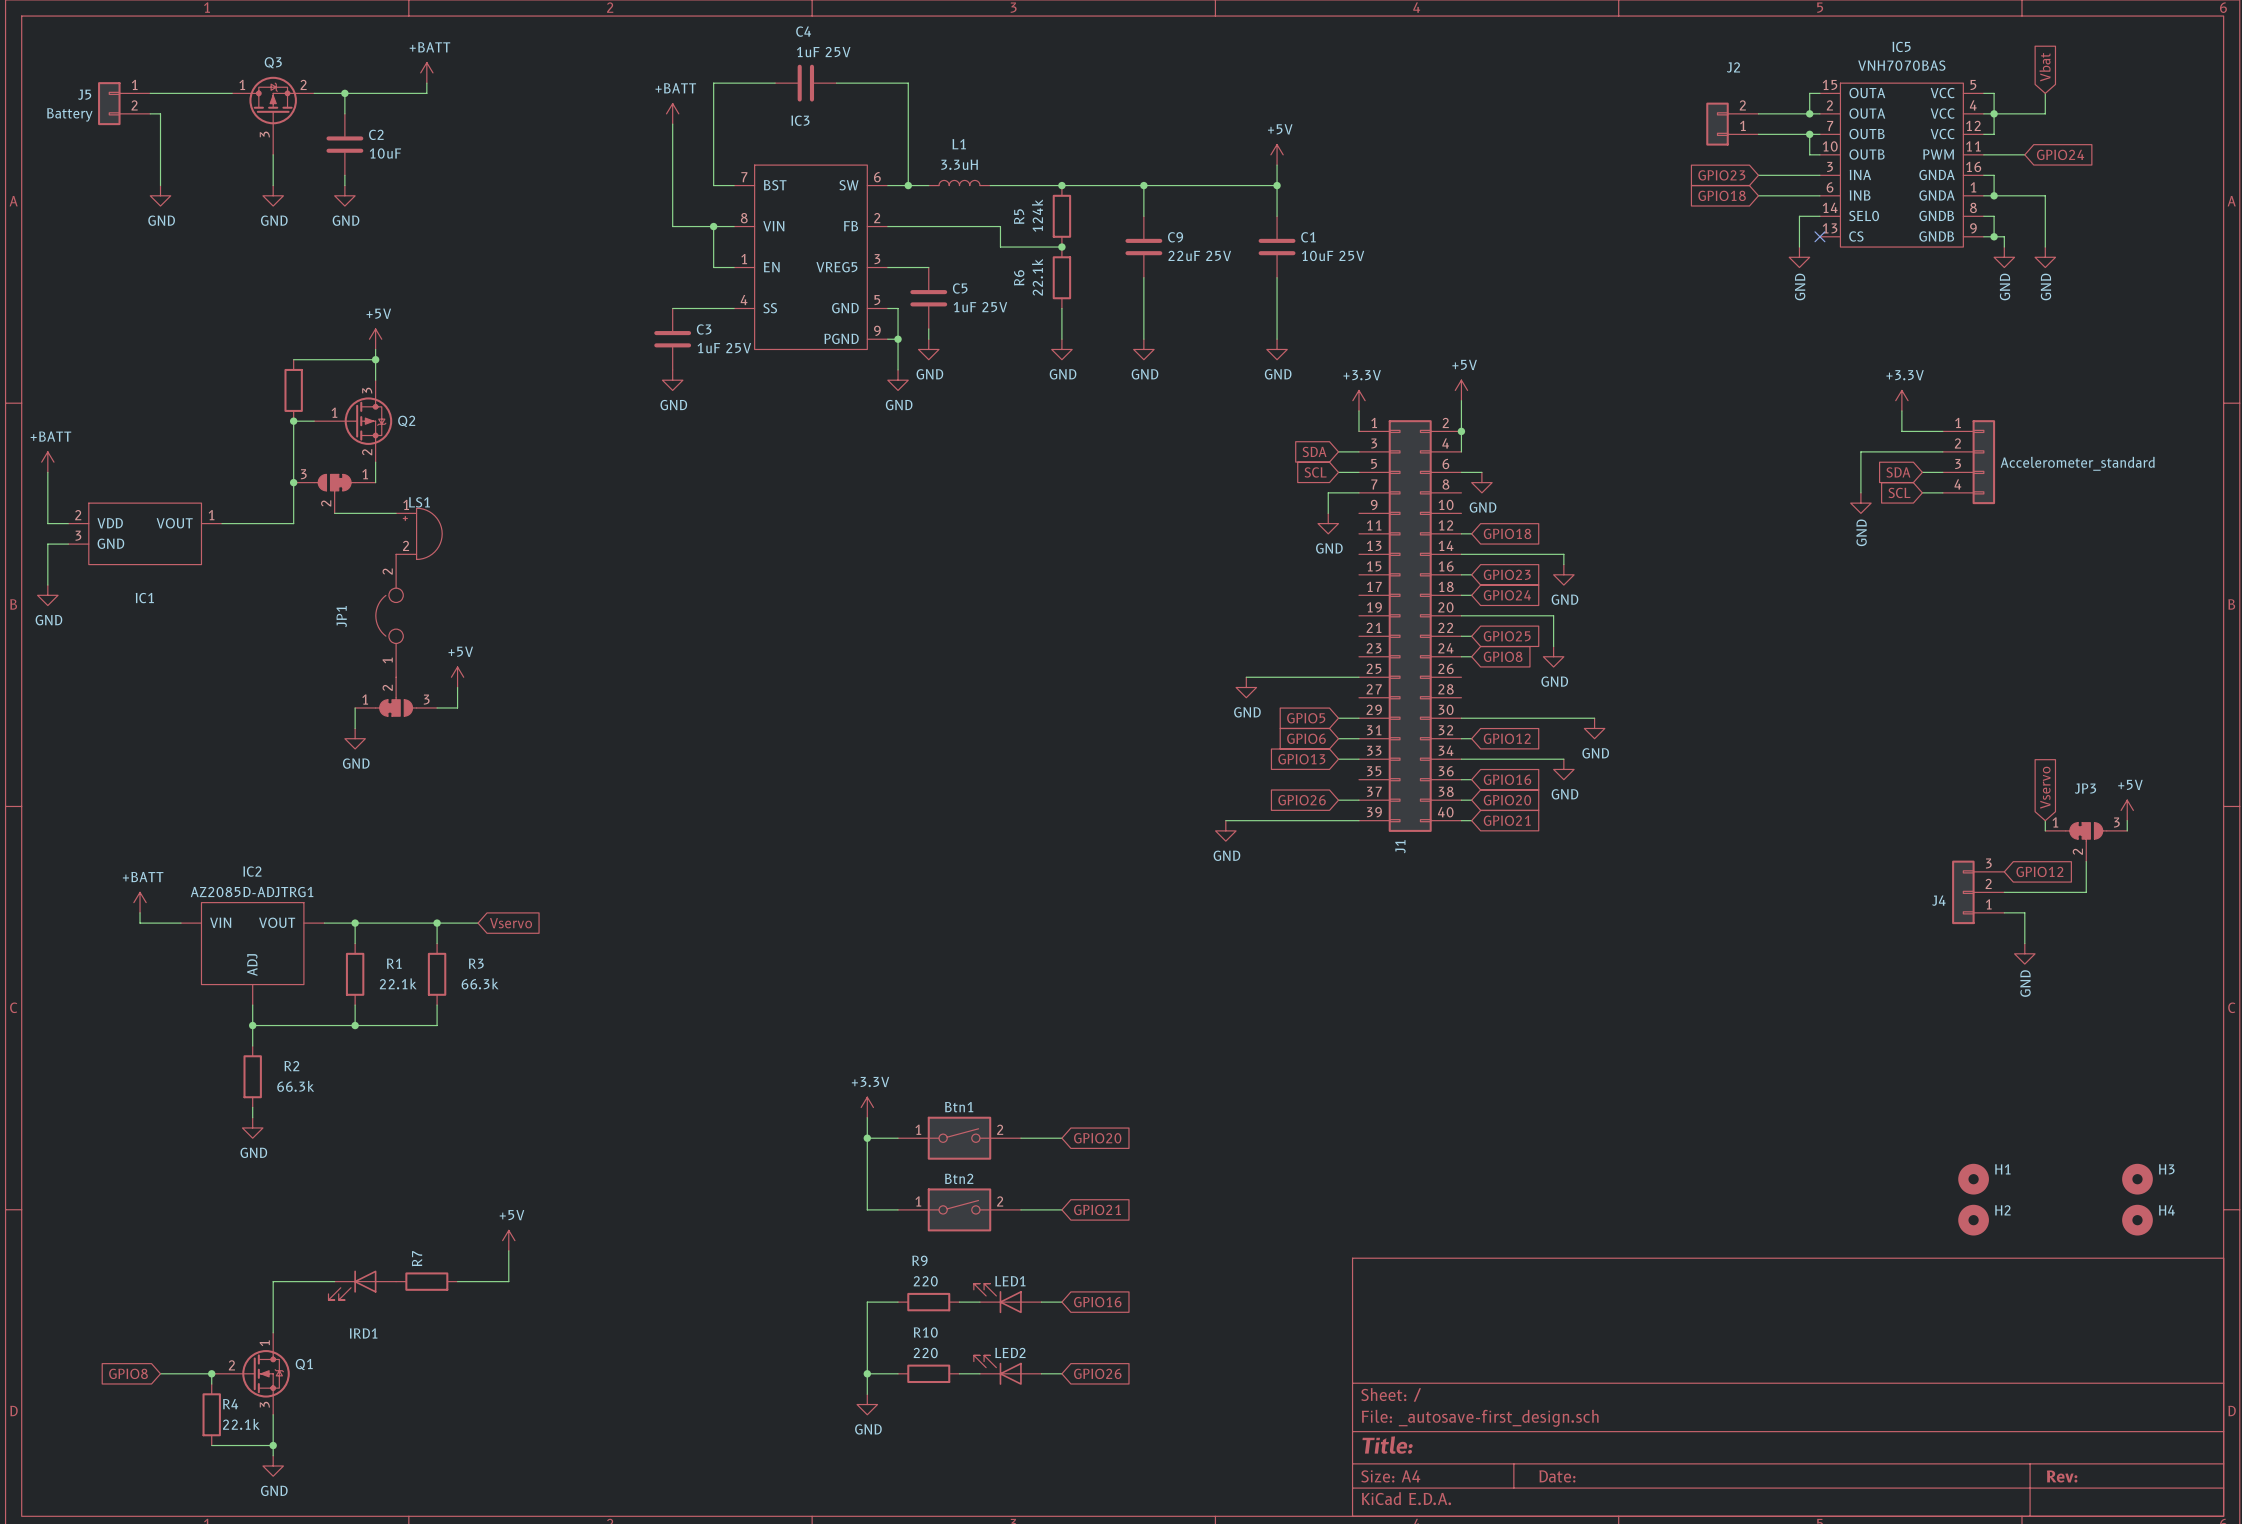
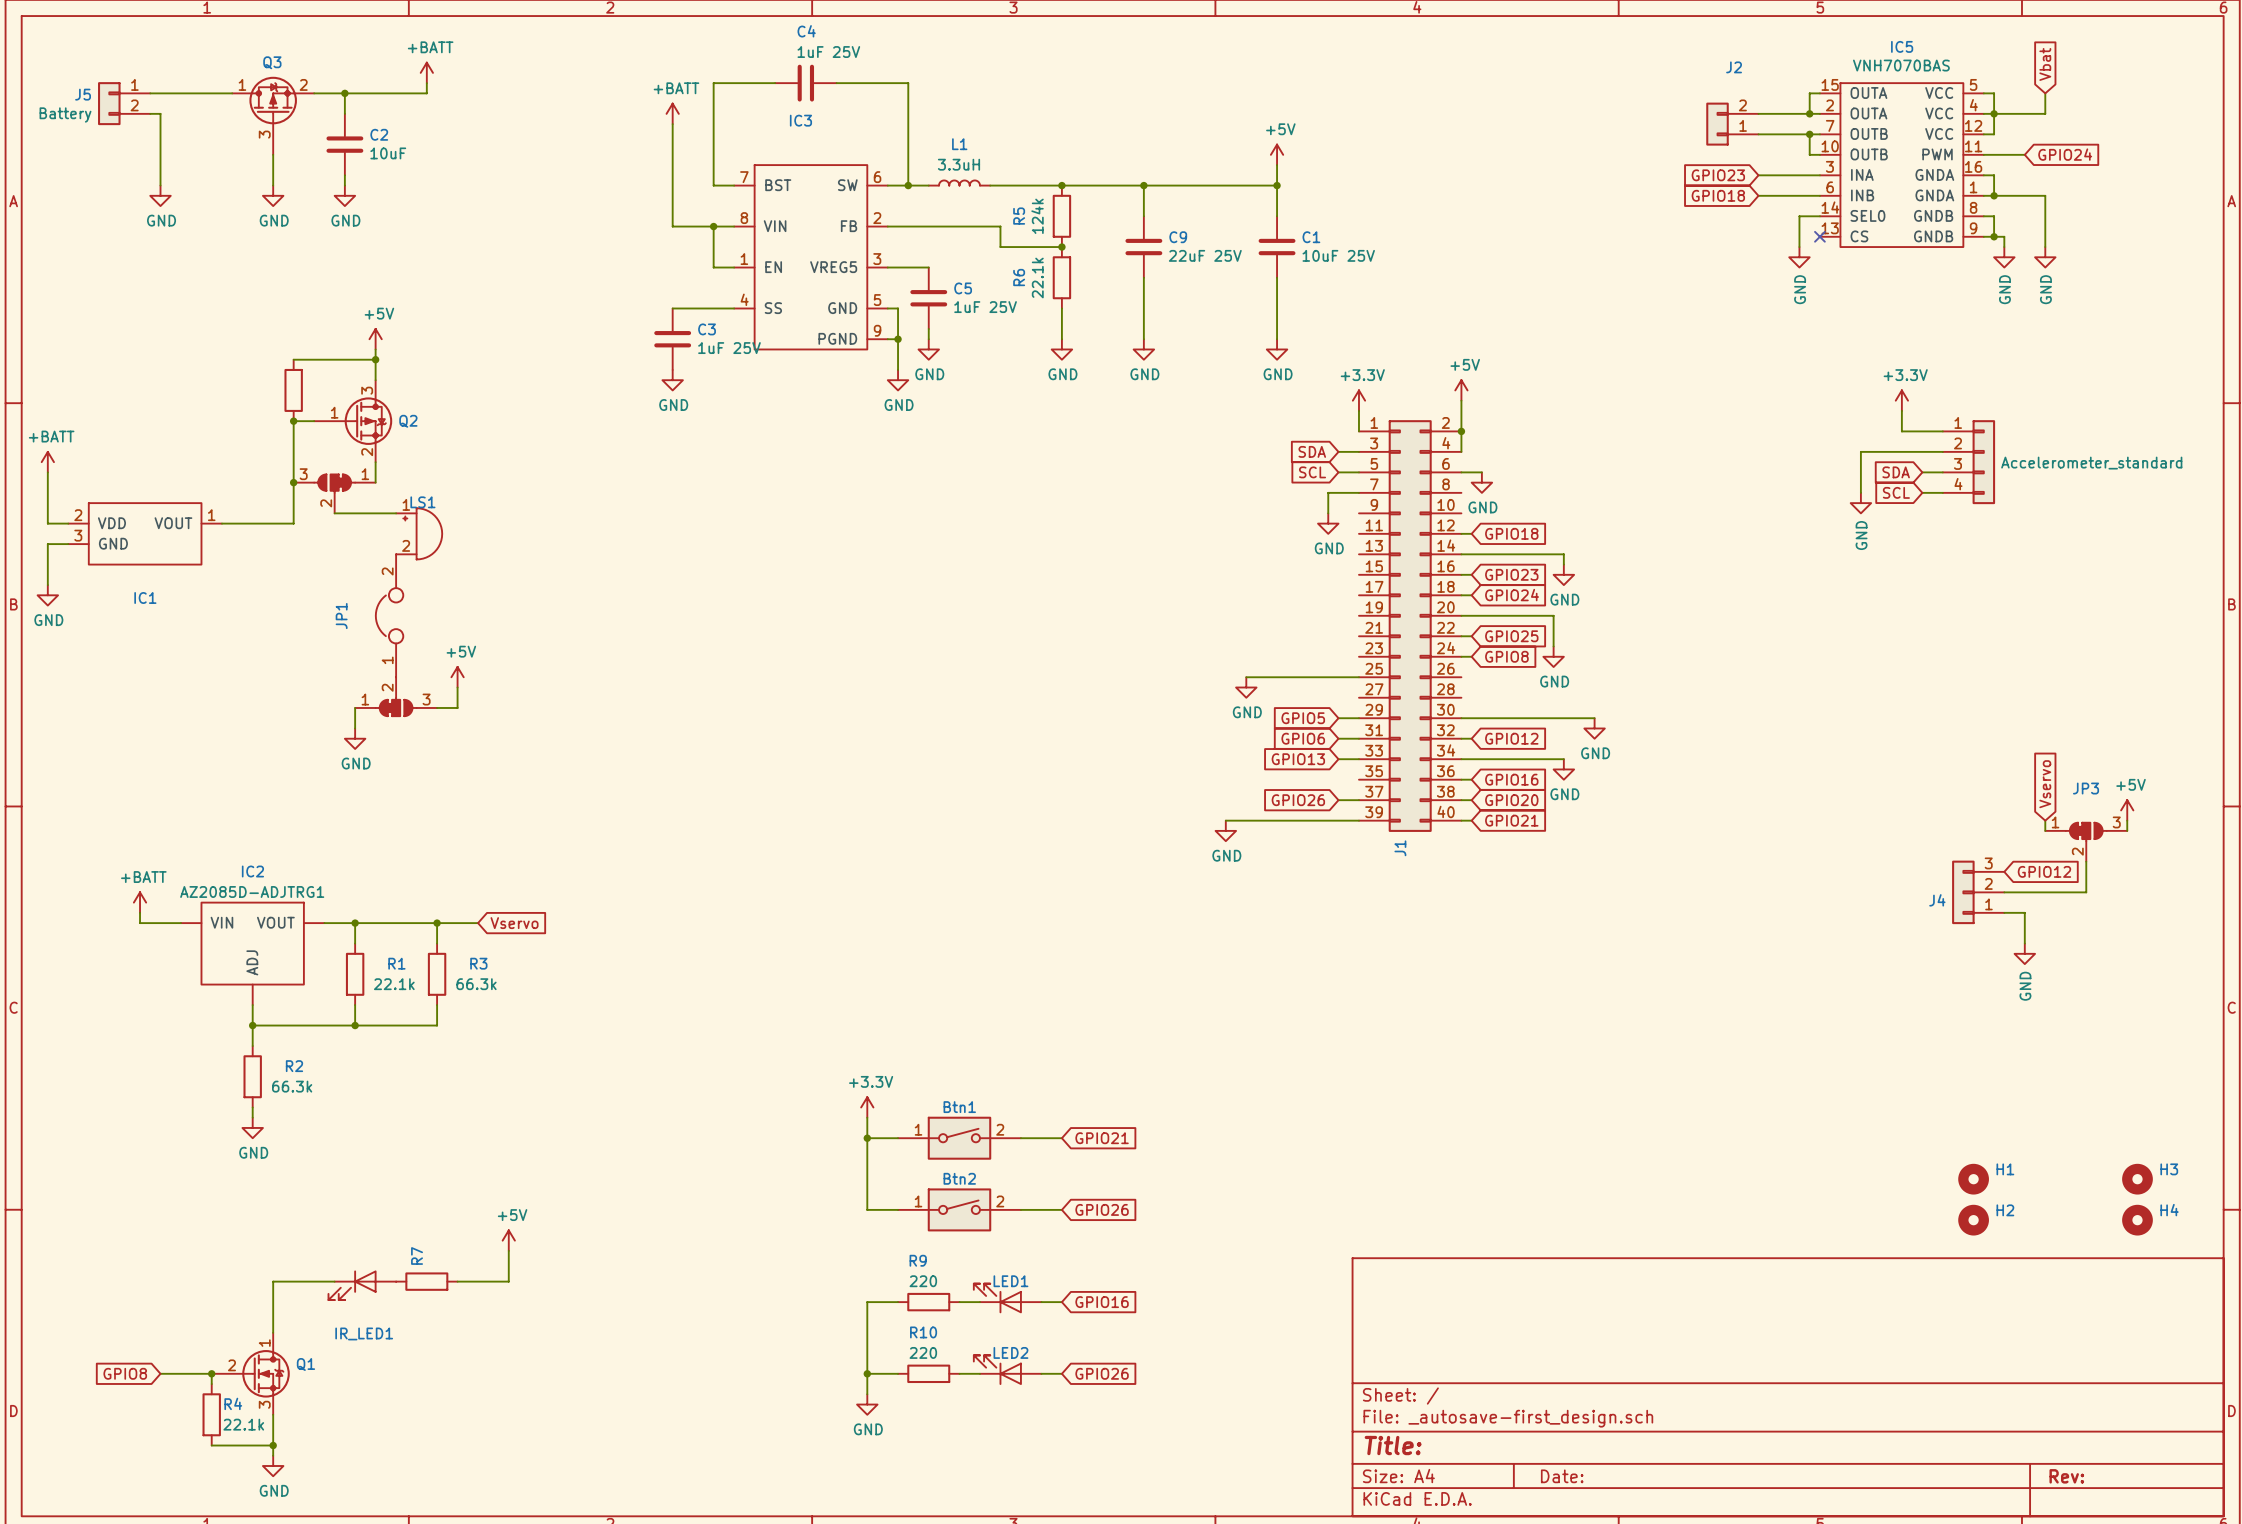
global label: GPIO20 (1097, 1138) -> GPIO21 (1102, 1138)
global label: GPIO21 (1097, 1209) -> GPIO26 (1102, 1209)
IRD1 name: IRD1 (363, 1333) -> IR_LED1 (364, 1333)

